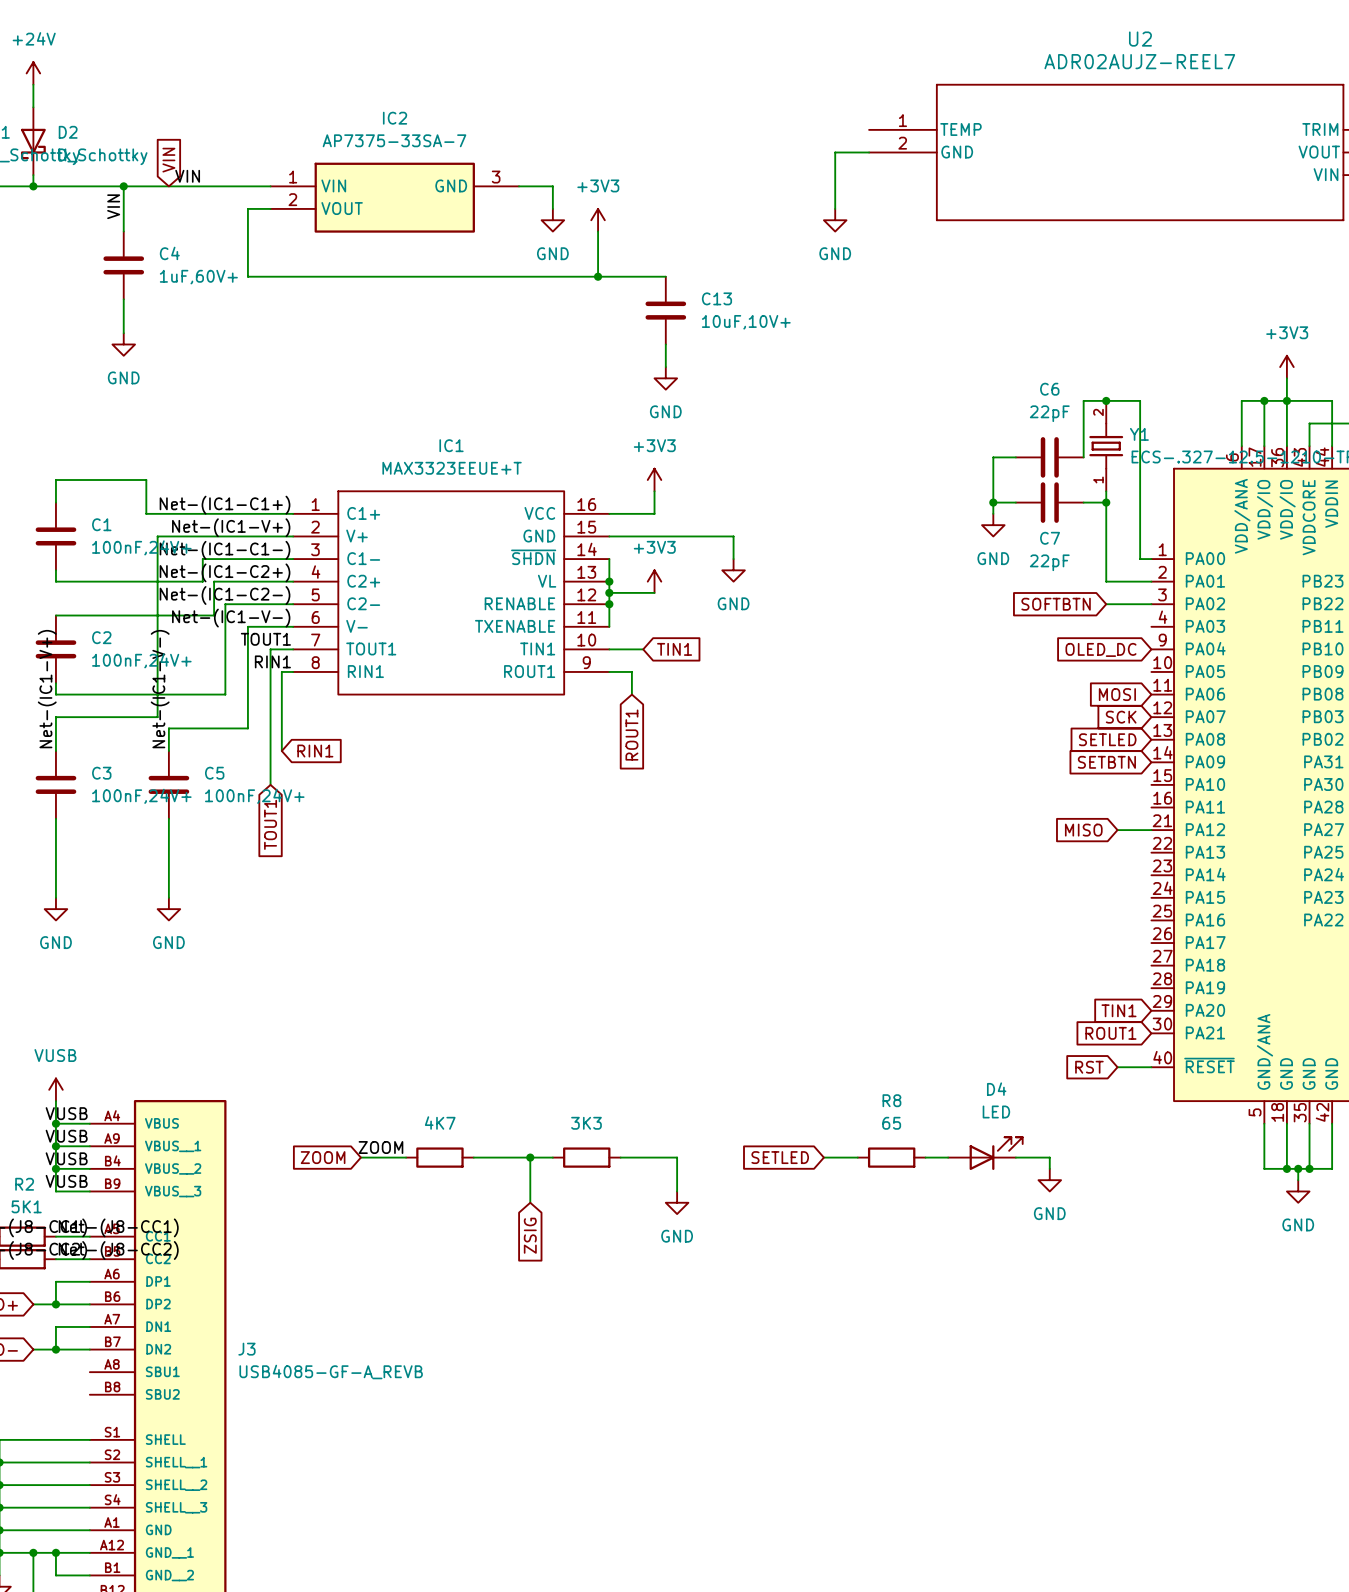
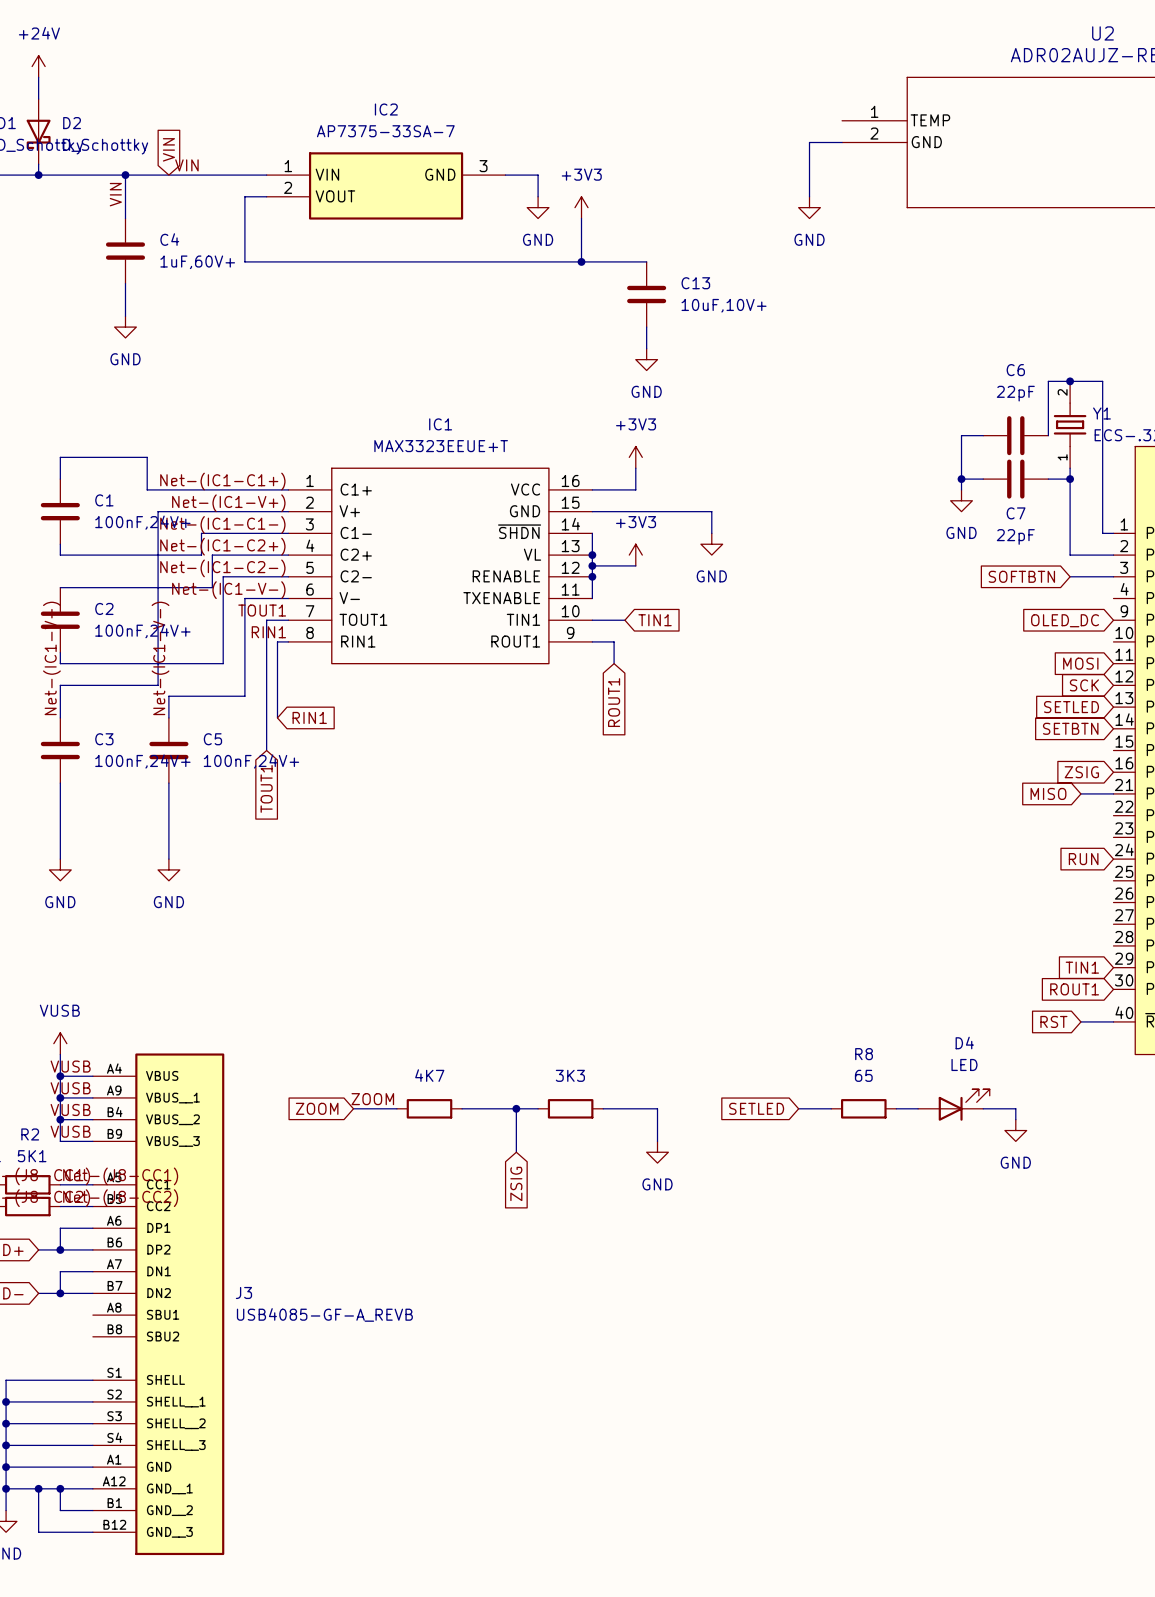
global label: none -> ZSIG (1081, 772)
global label: none -> RUN (1083, 859)

